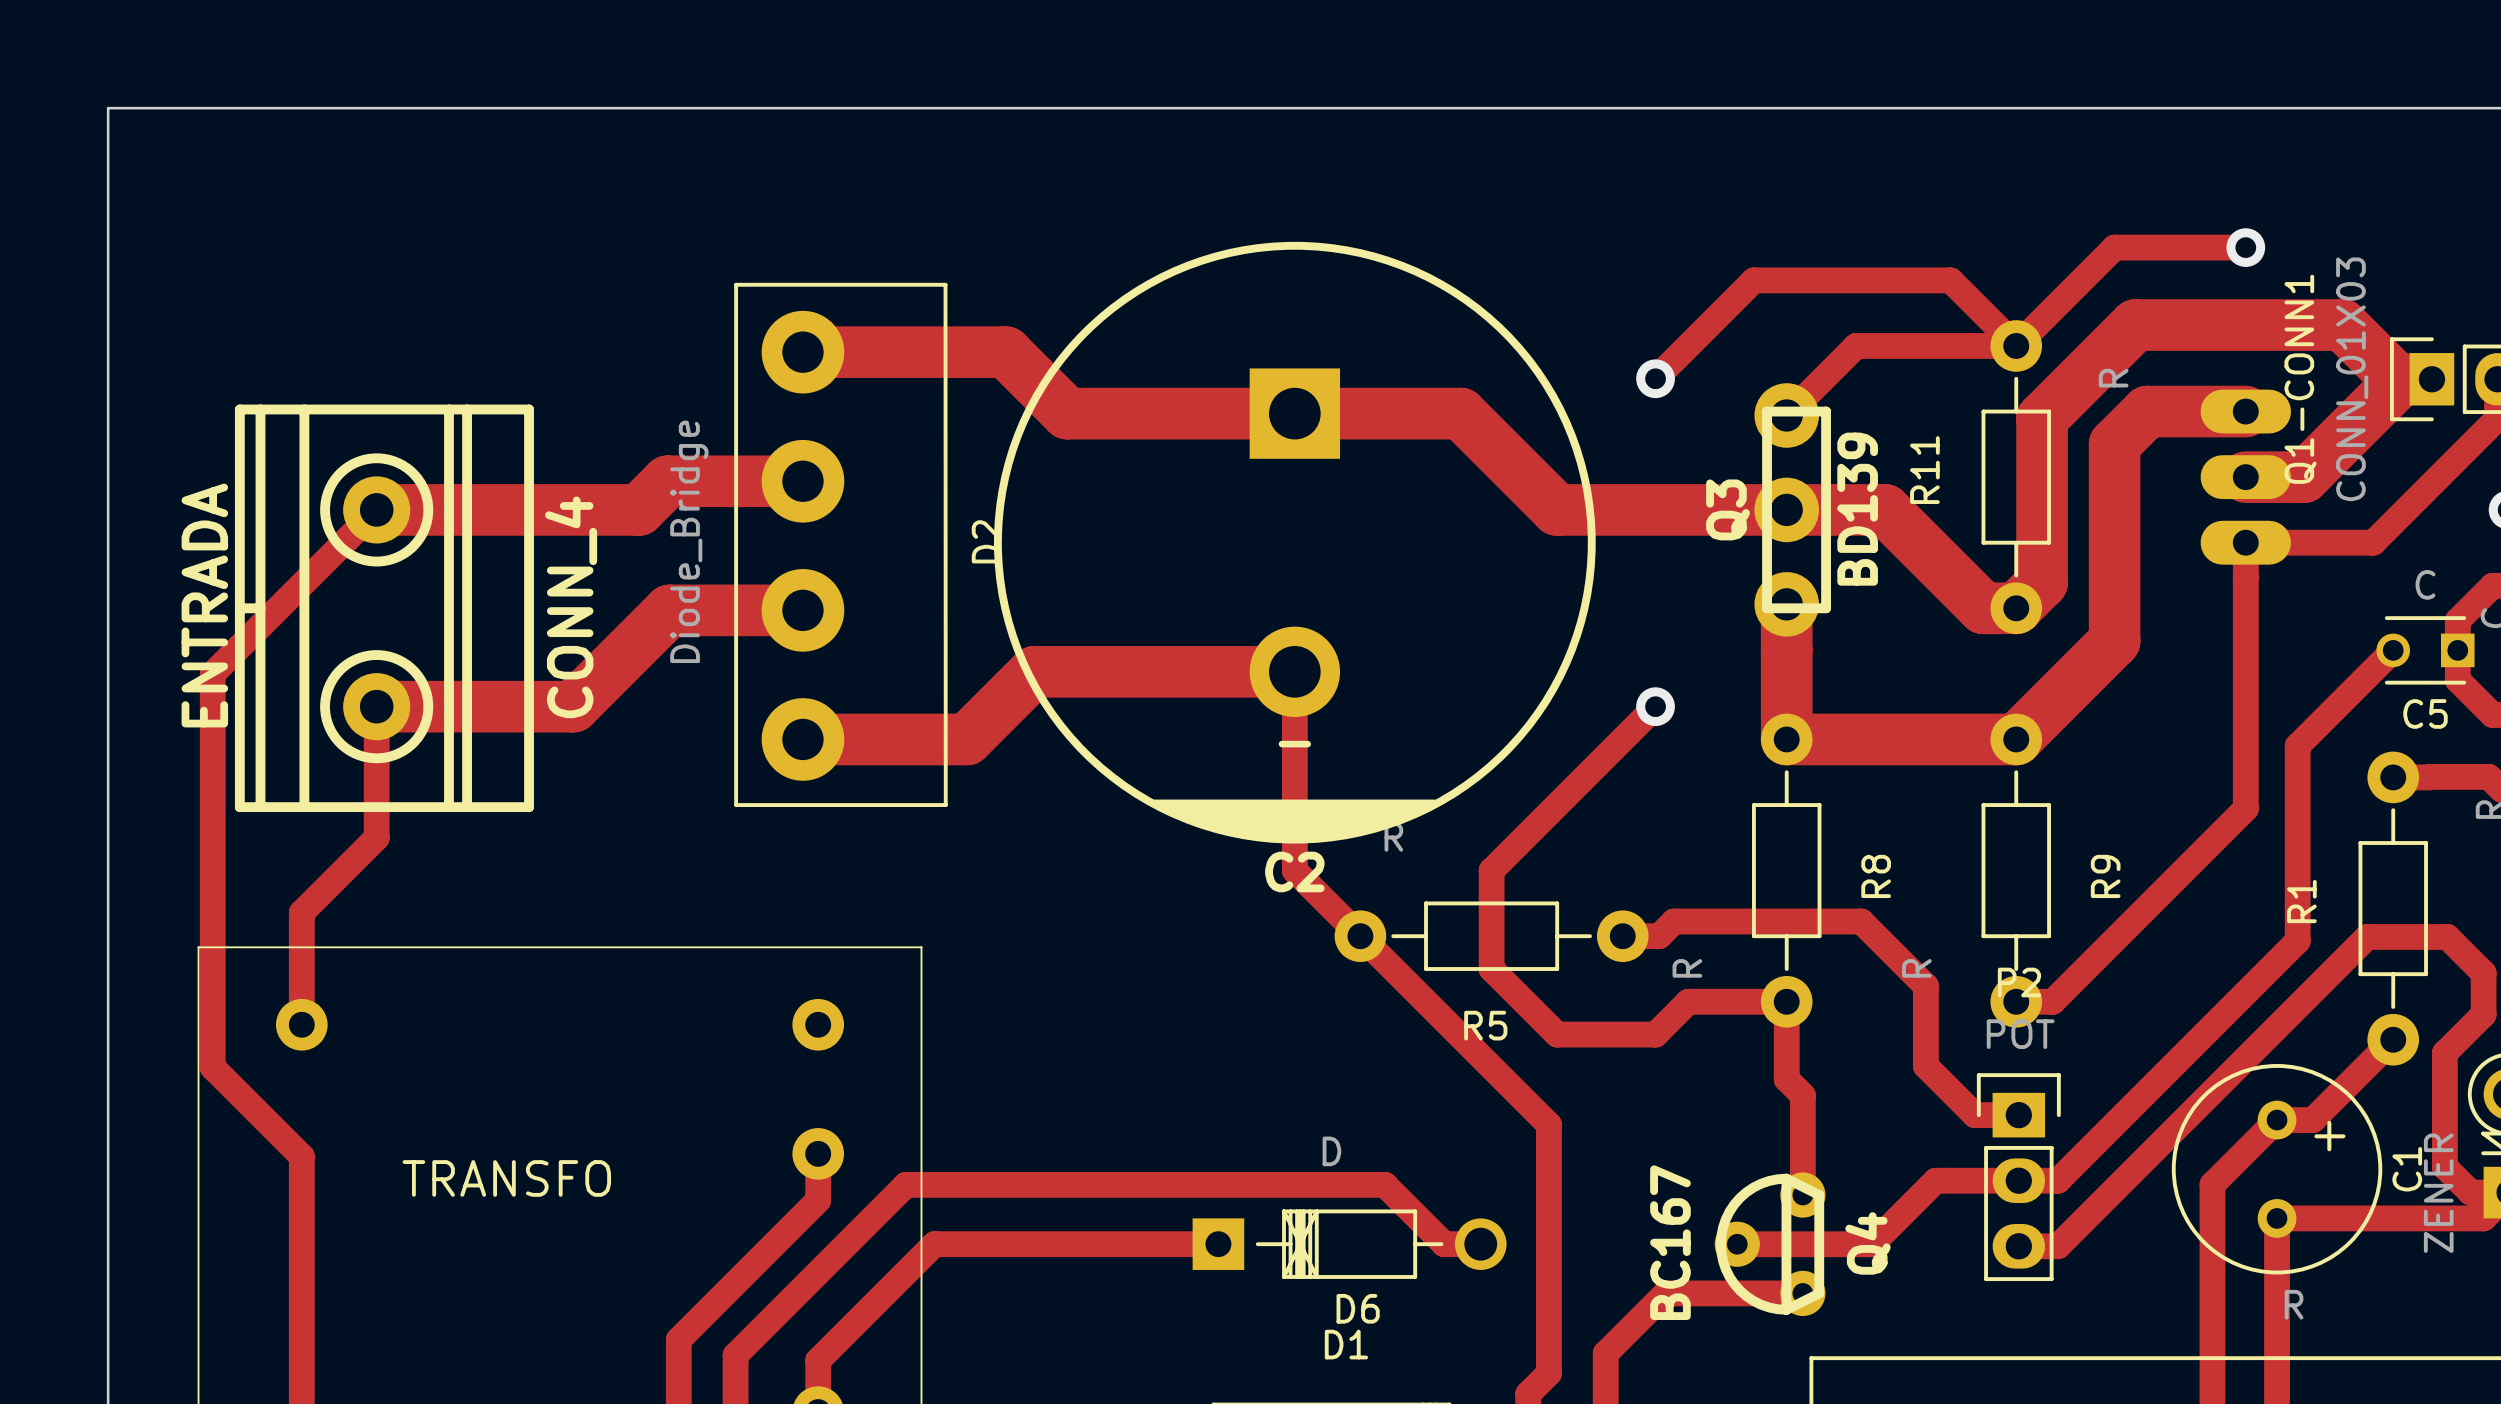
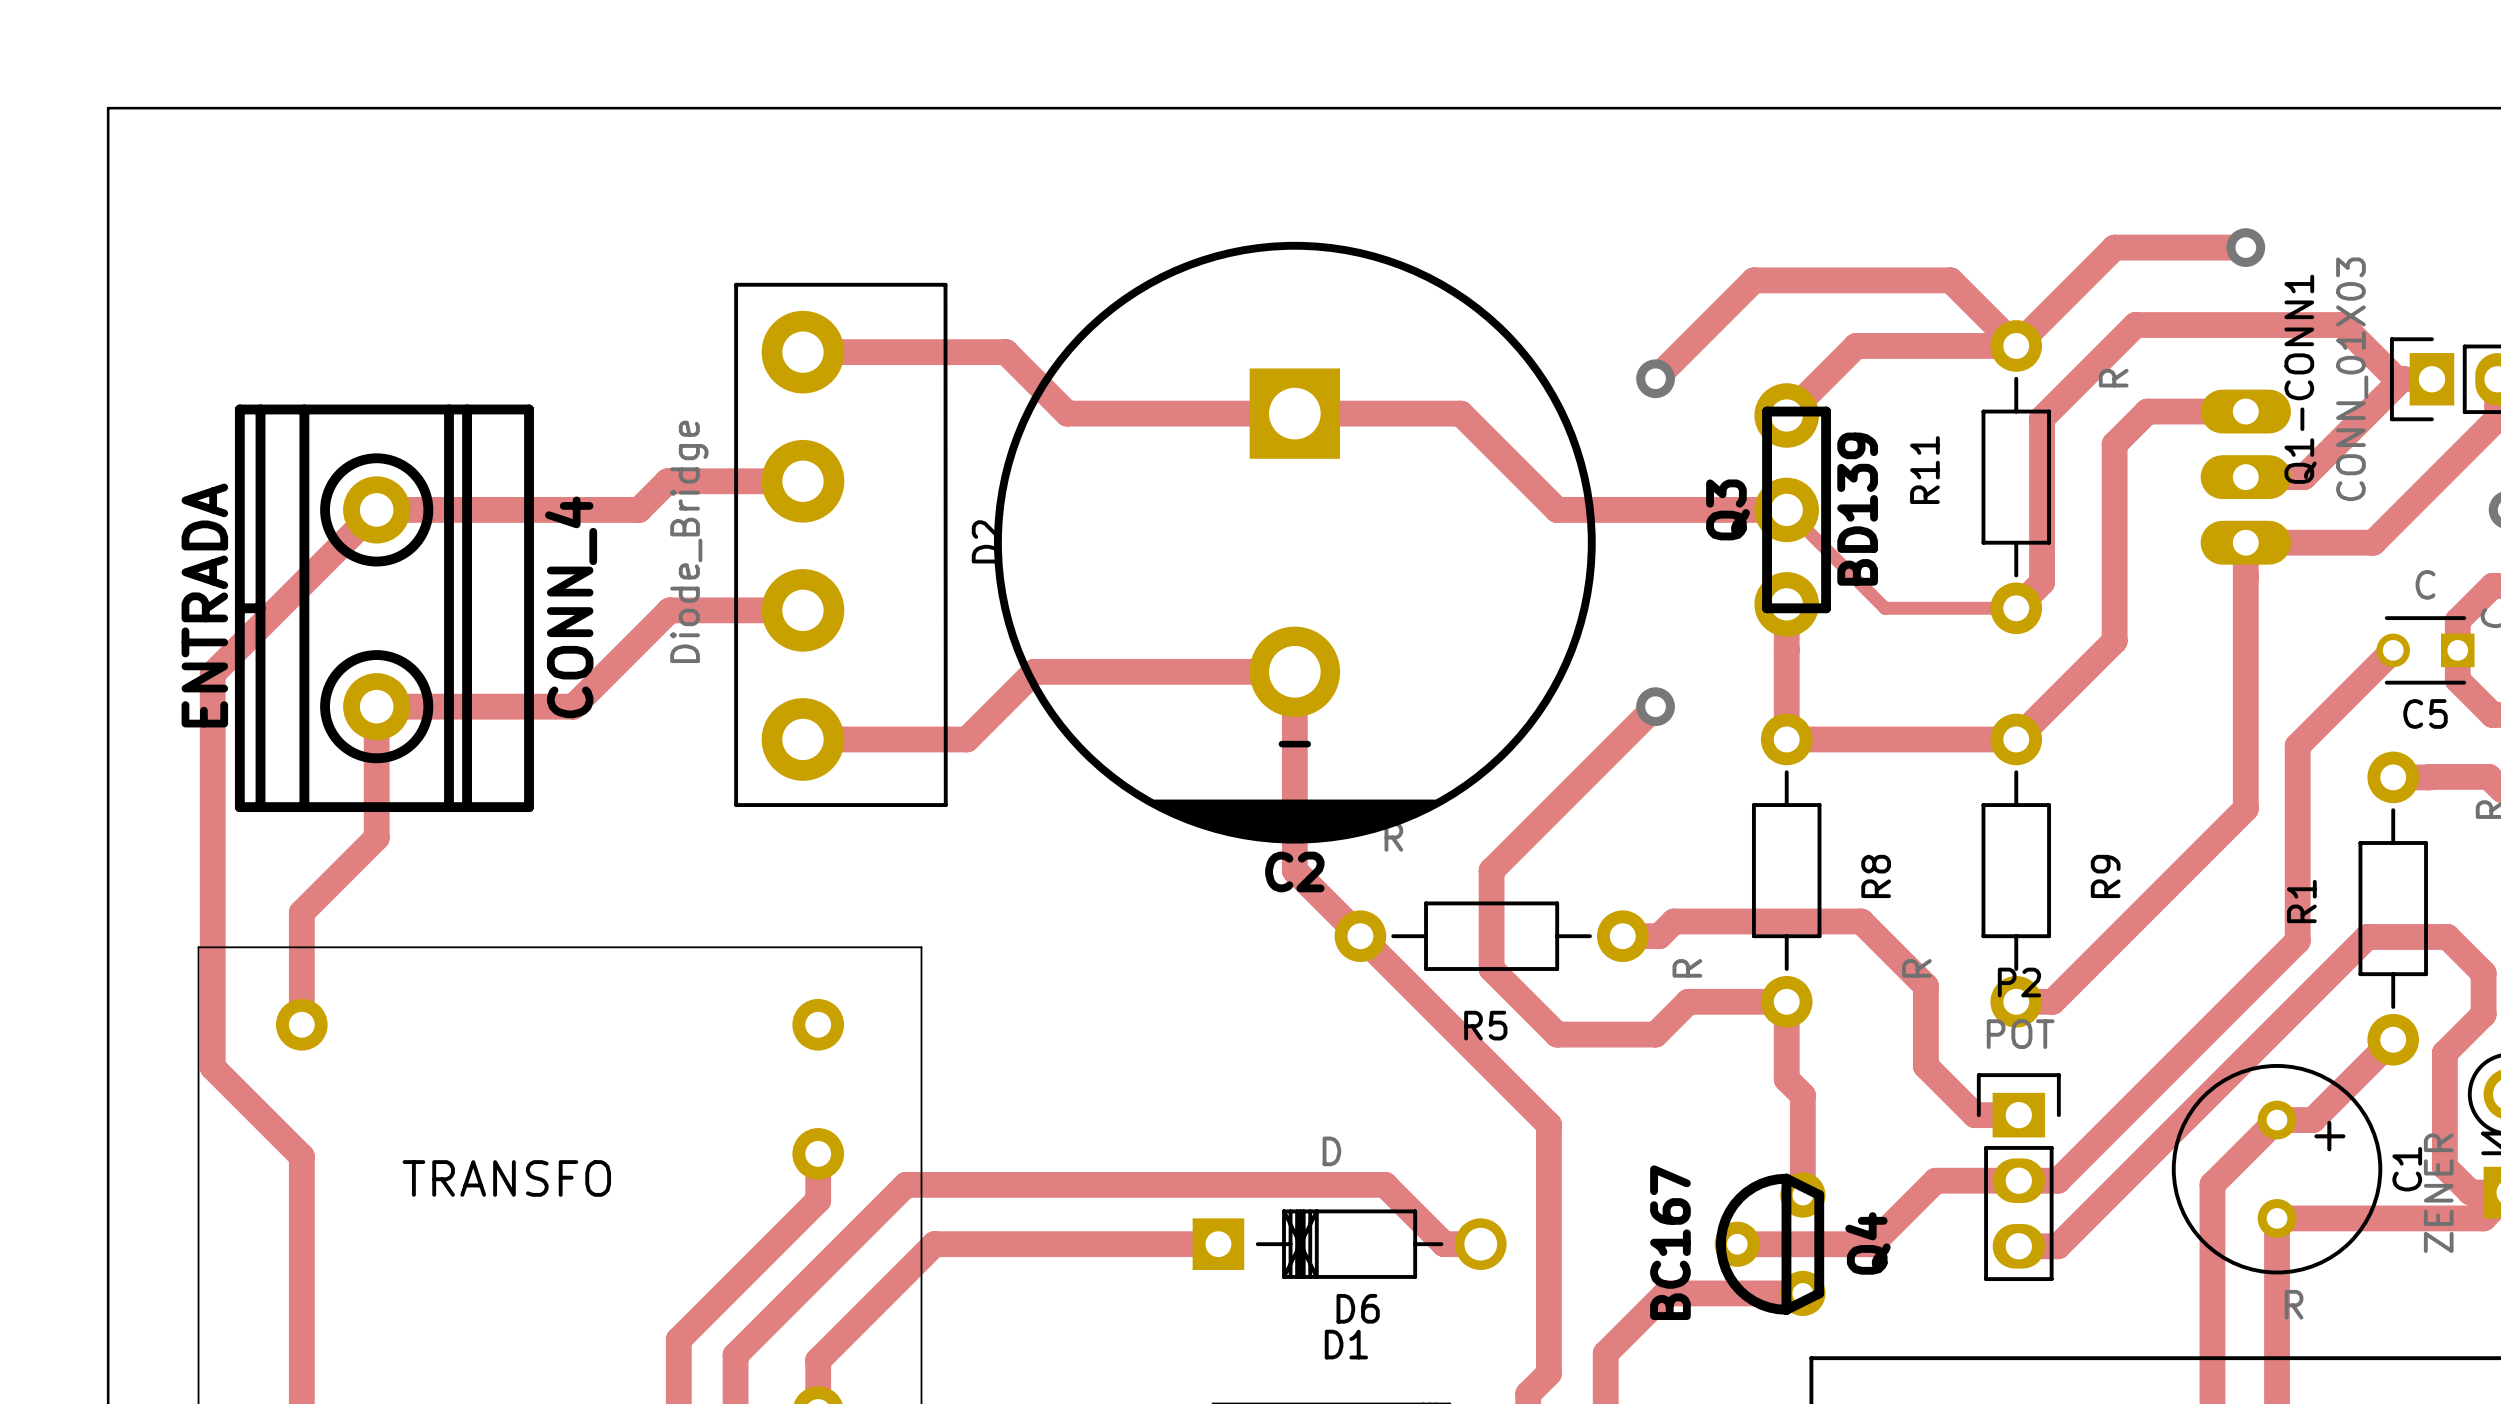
track width: thick (802, 352) (1005, 352) (1067, 413) (1460, 413) (1557, 509) (1786, 509) -> thin (802, 352) (1005, 352) (1067, 413) (1460, 413) (1557, 509) (1786, 509)
track width: thick (2401, 379) (2303, 477) (2245, 477) -> thin (2401, 379) (2303, 477) (2245, 477)
track width: thick (2404, 379) (2396, 379) (2342, 325) (2135, 325) (2042, 418) (2042, 582) (2016, 608) (1983, 608) -> thin (2404, 379) (2396, 379) (2342, 325) (2135, 325) (2042, 418) (2042, 582) (2016, 608) (1983, 608)
track width: thick (2245, 411) (2147, 411) (2114, 444) (2114, 641) (2016, 739) (1786, 739) (1786, 604) -> thin (2245, 411) (2147, 411) (2114, 444) (2114, 641) (2016, 739) (1786, 739) (1786, 604)
track width: thick (802, 481) (667, 481) (639, 509) (376, 509) -> thin (802, 481) (667, 481) (639, 509) (376, 509)
track: (1786, 509) (1885, 509) (1983, 608) -> (1786, 509) (1885, 608) (1983, 608)
track width: thick (802, 610) (669, 610) (573, 706) (376, 706) -> thin (802, 610) (669, 610) (573, 706) (376, 706)
track width: thick (1294, 671) (1034, 671) (966, 739) (802, 739) -> thin (1294, 671) (1034, 671) (966, 739) (802, 739)

